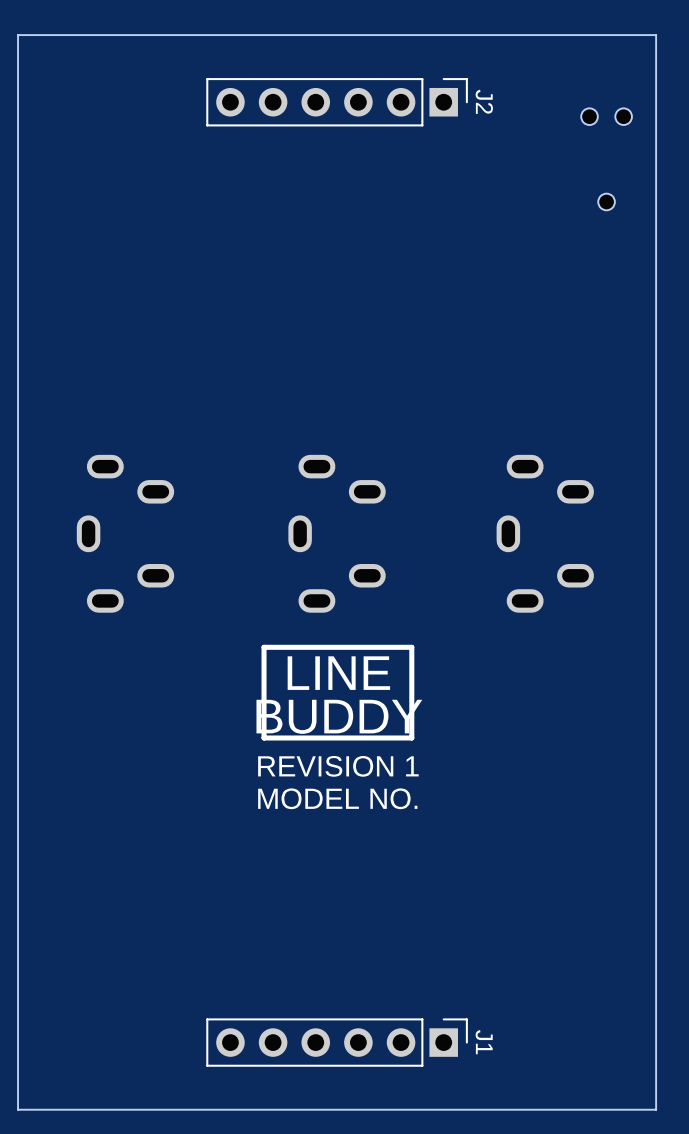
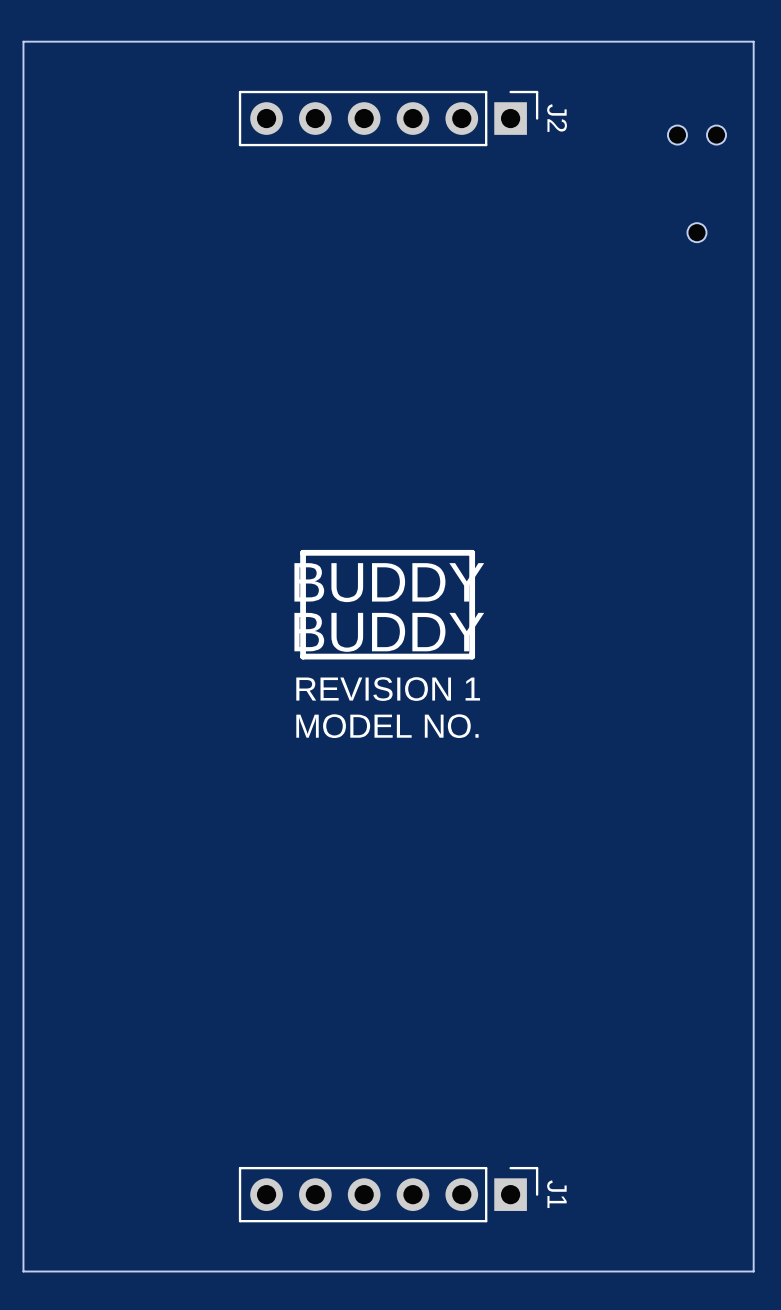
text: none -> BUDDY (389, 582)
part: (125, 533) -> none
part: (337, 533) -> none
part: (545, 533) -> none
text: none -> BUDDY (389, 632)
line: (411, 647) (264, 647) (264, 737) (411, 737) (411, 647) -> (472, 552) (303, 552) (303, 656) (472, 656) (472, 552)
text: LINE (338, 673) -> none
text: BUDDY (339, 716) -> none
text position: REVISION 1 (338, 766) -> REVISION 1 (388, 689)
text position: MODEL NO. (337, 798) -> MODEL NO. (387, 726)

